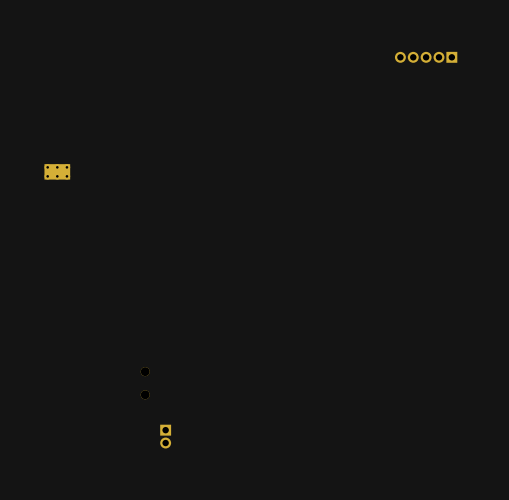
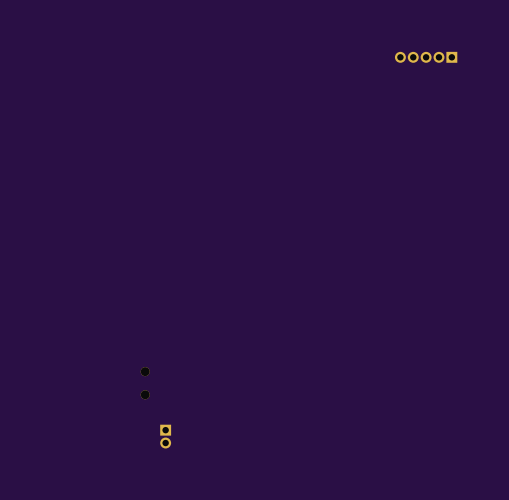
part: (57, 171) -> none

